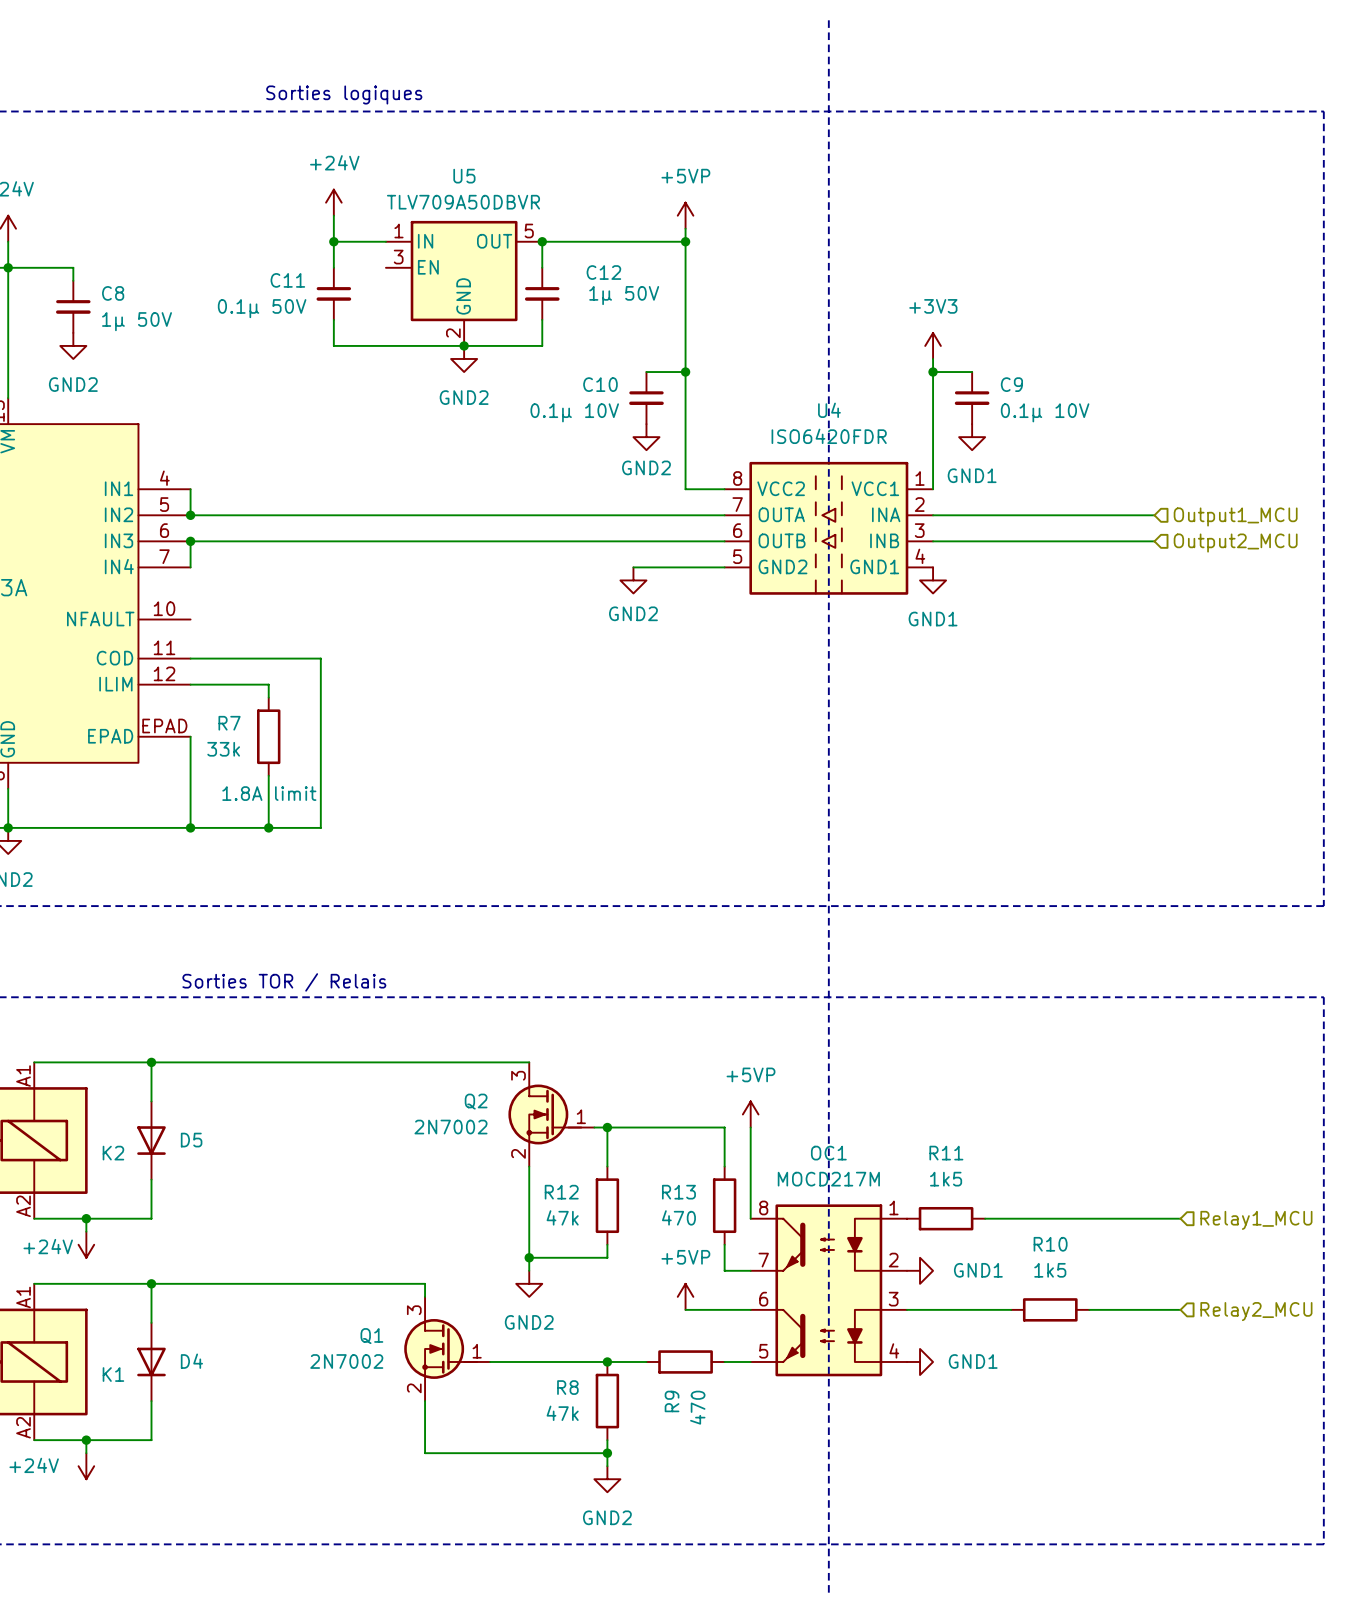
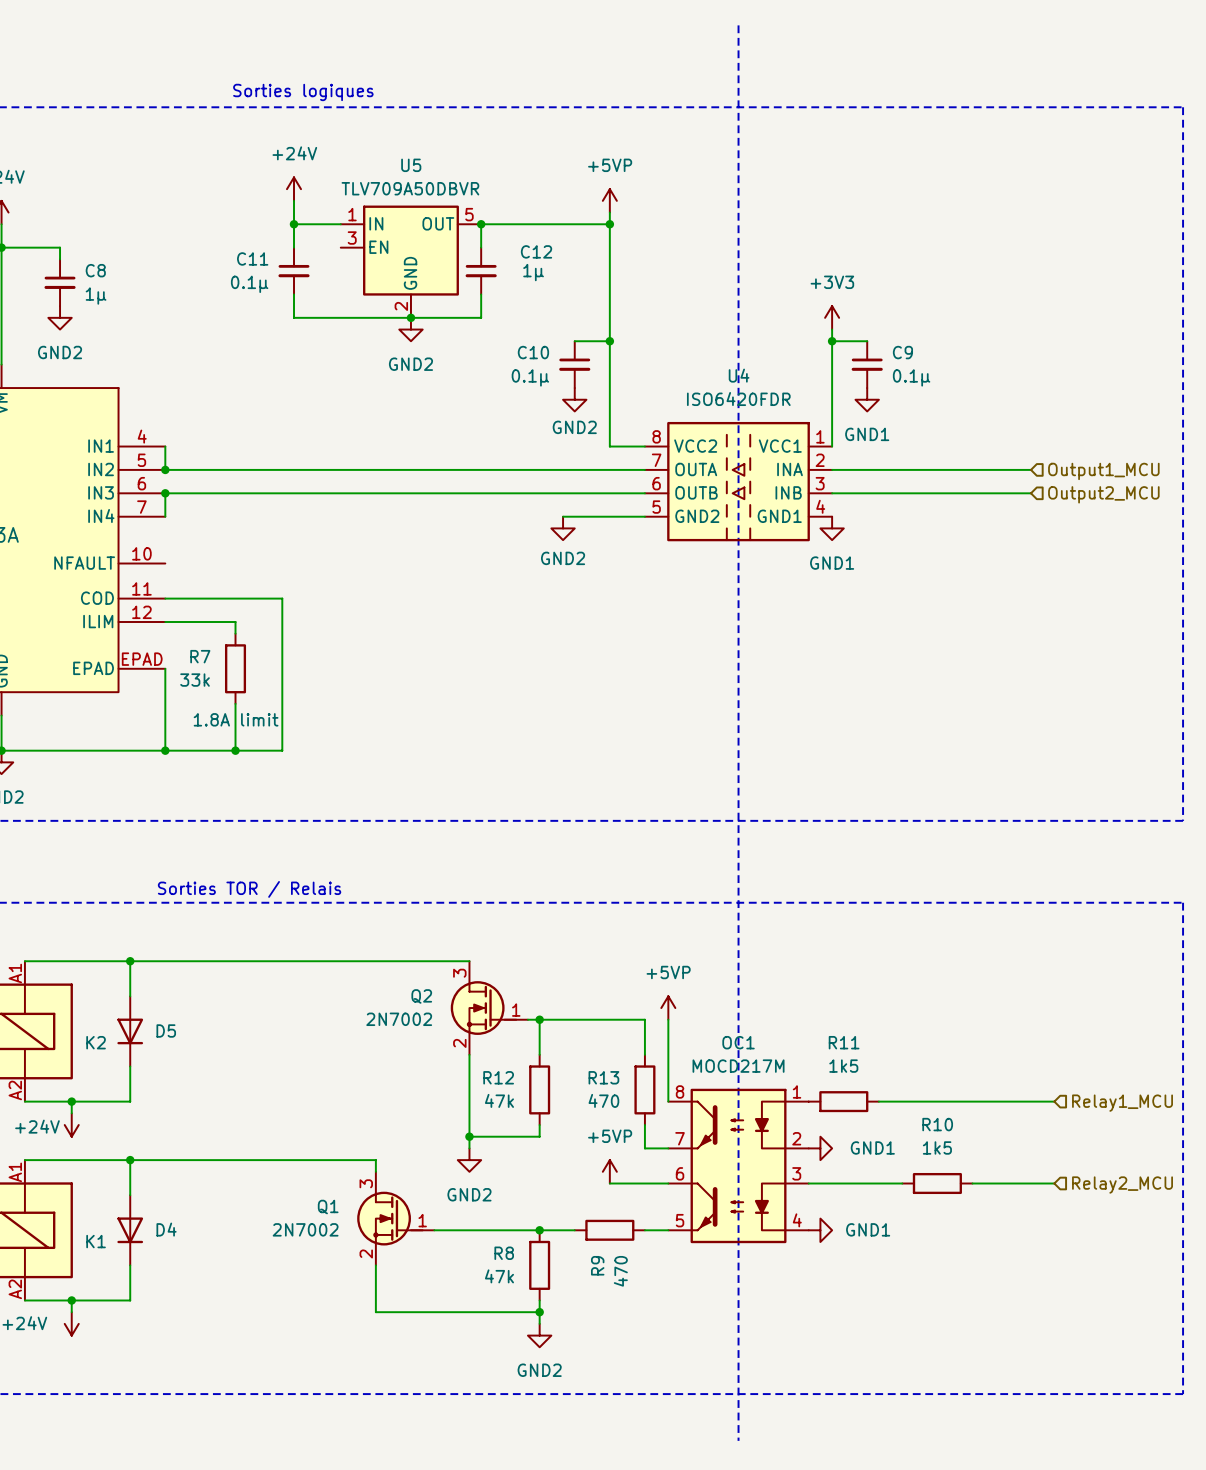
C12 value: 1µ 50V (624, 295) -> 1µ (533, 272)
C11 value: 0.1µ 50V (262, 308) -> 0.1µ (249, 284)
C8 value: 1µ 50V (137, 321) -> 1µ (96, 296)
C10 value: 0.1µ 10V (574, 412) -> 0.1µ (530, 377)
C9 value: 0.1µ 10V (1045, 412) -> 0.1µ (911, 377)

